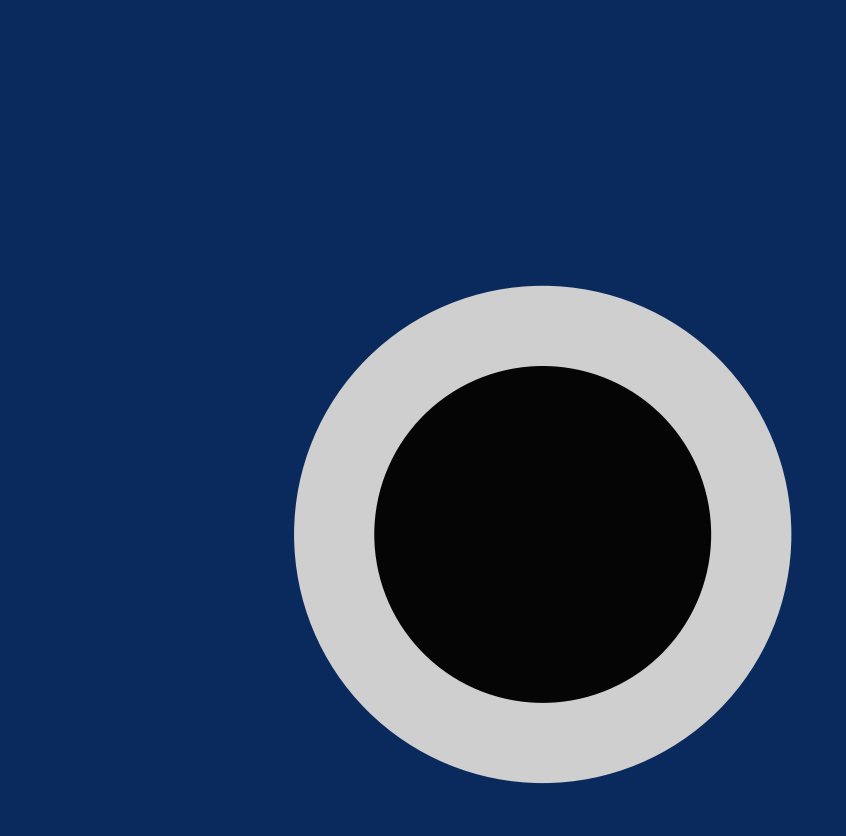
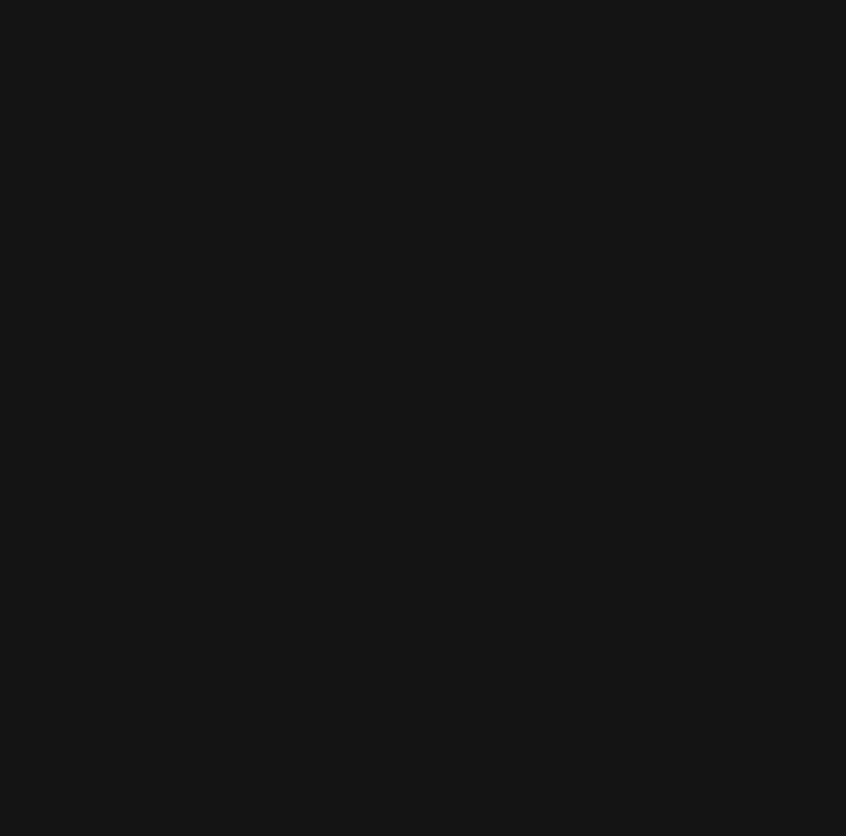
part: (542, 534) -> none

